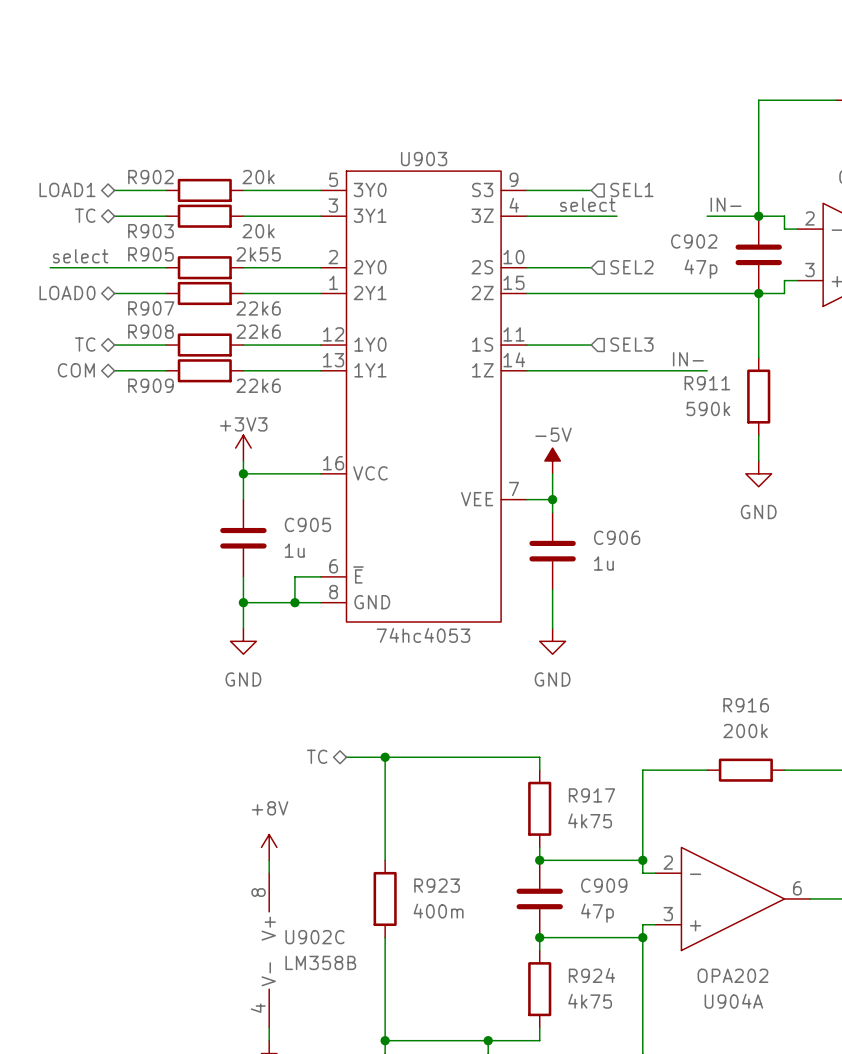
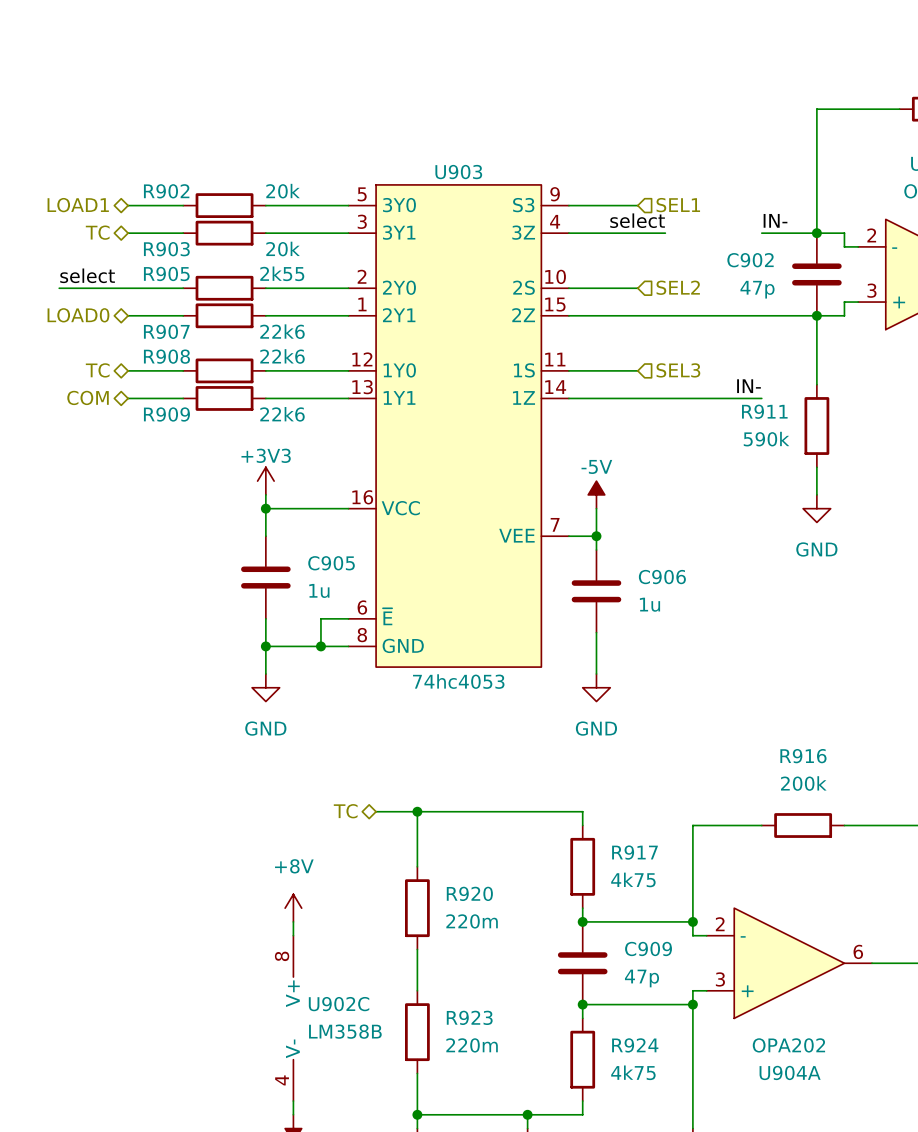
wire: (385, 808) (385, 860) -> none
R920: none -> 220m (417, 908)
wire: none -> (417, 949) (417, 990)
R923 position: (385, 898) -> (417, 1032)
R923 value: 400m (438, 911) -> 220m (472, 1045)
wire: (385, 937) (385, 1002) -> none

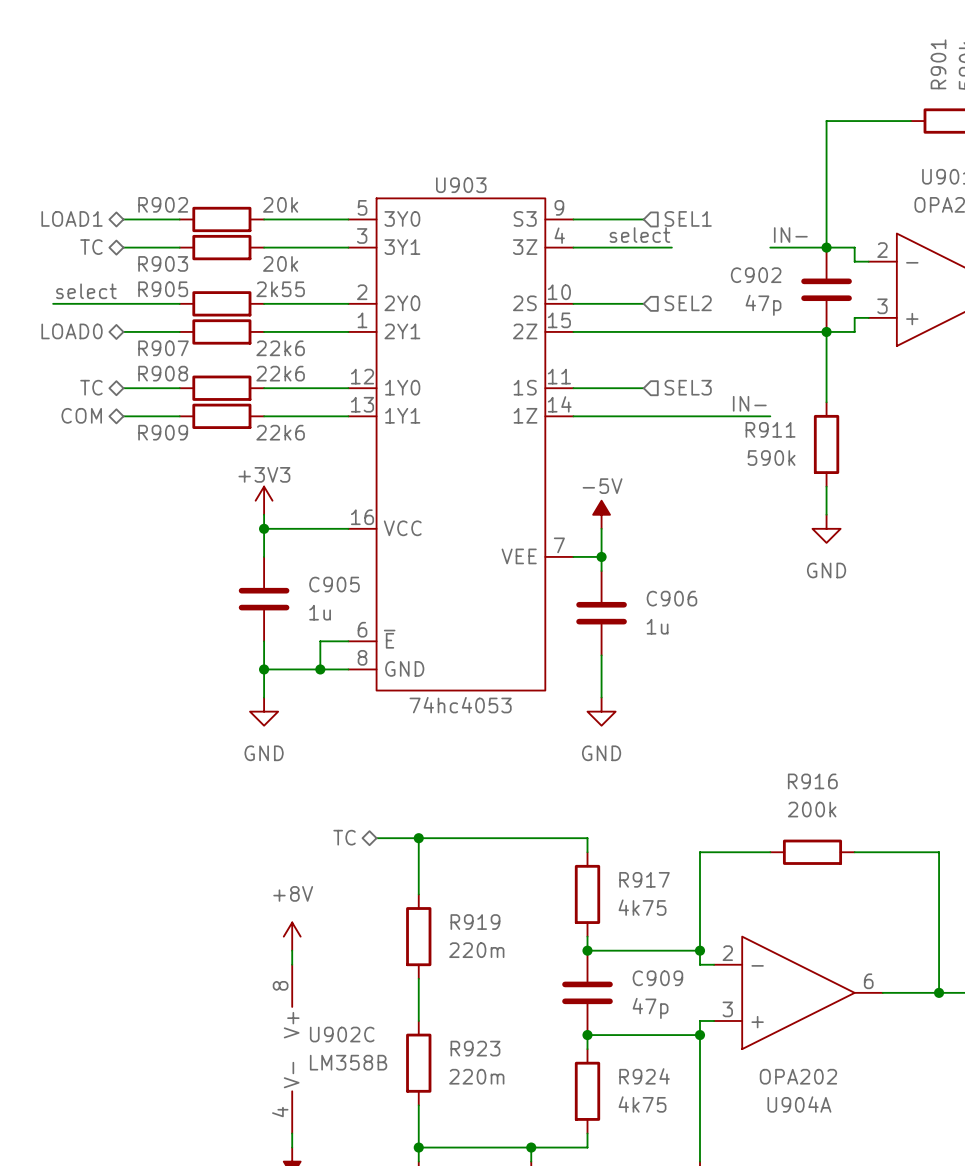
R920 name: R920 (469, 893) -> R919 (475, 922)

